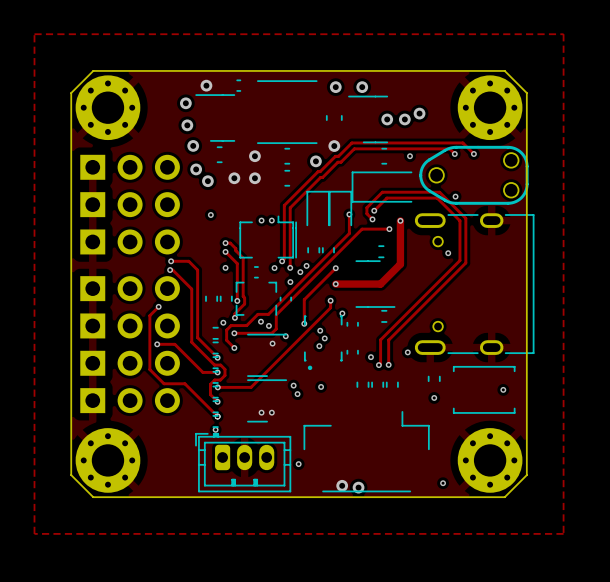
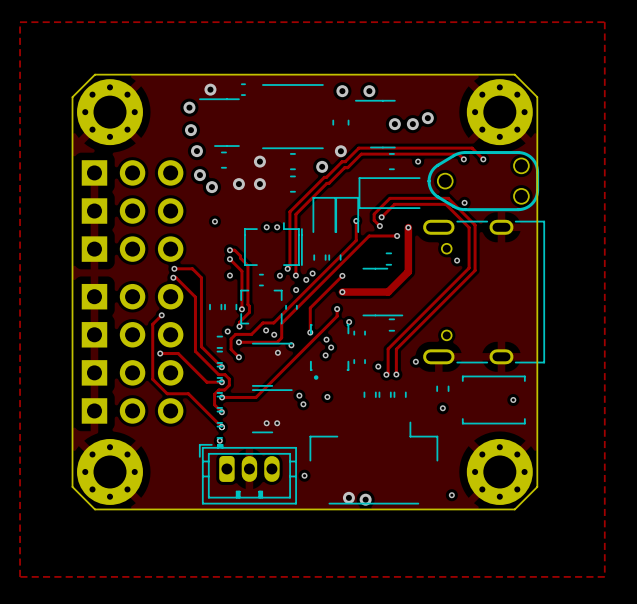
zone outline: (34, 34) (563, 34) (563, 533) (34, 533) (34, 34) -> (20, 22) (20, 576) (604, 576) (604, 22) (20, 22)

